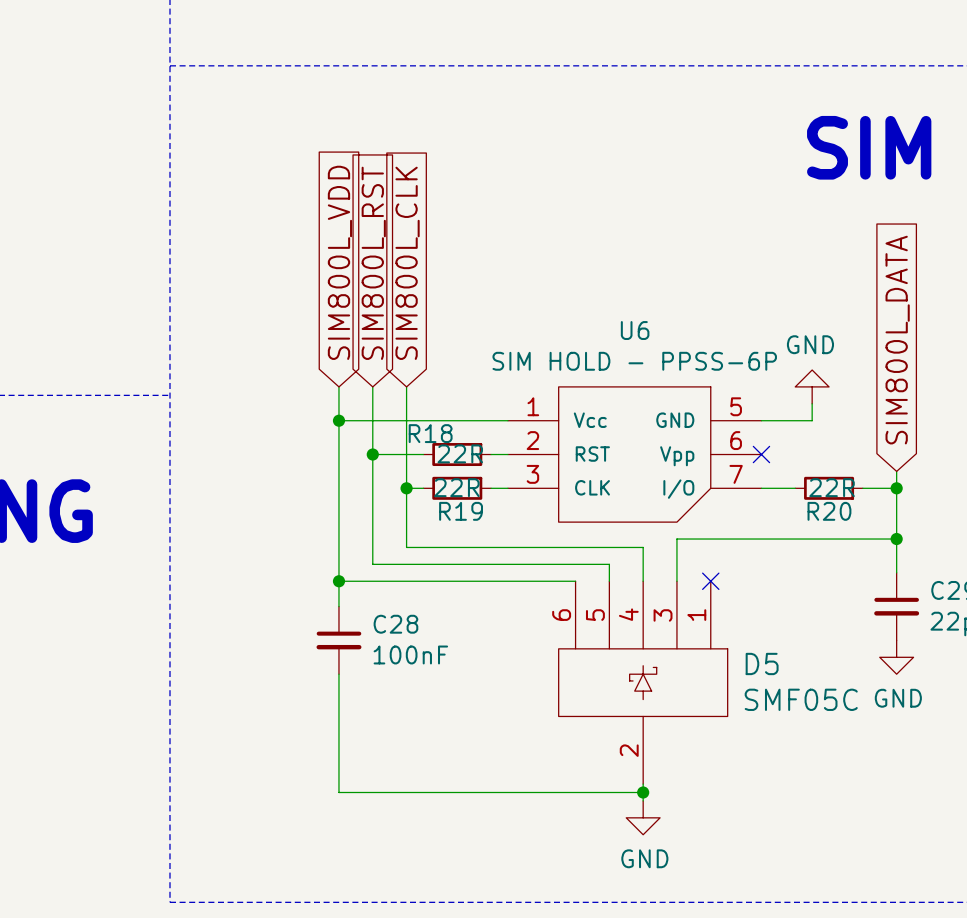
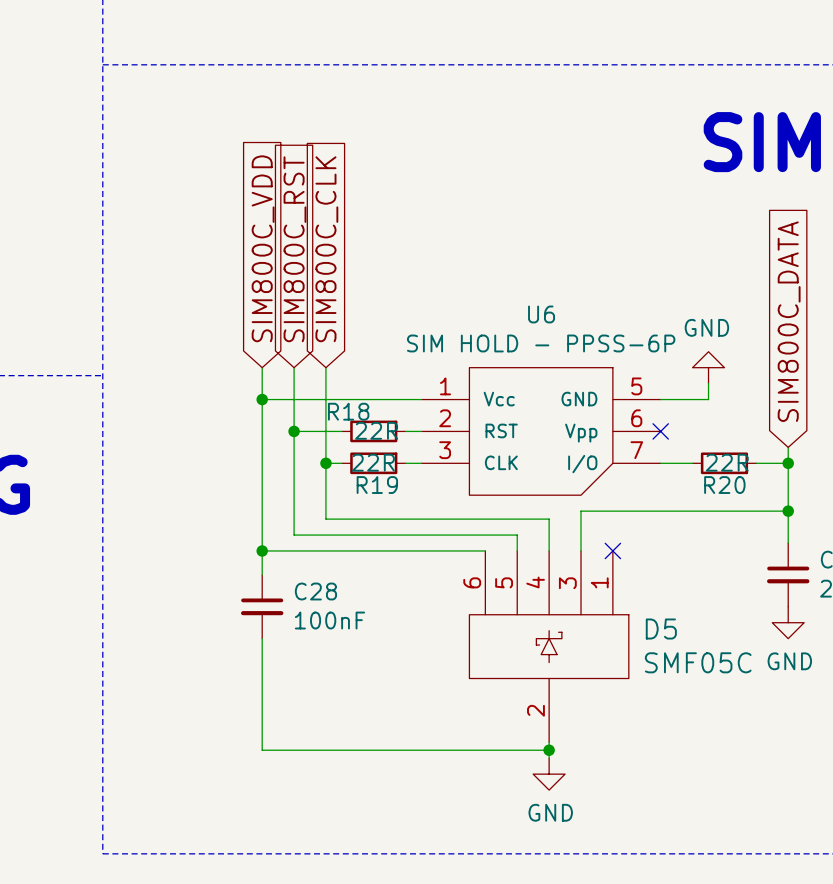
global label: SIM800L_VDD (339, 262) -> SIM800C_VDD (263, 248)
global label: SIM800L_RST (373, 263) -> SIM800C_RST (294, 249)
global label: SIM800L_CLK (407, 263) -> SIM800C_CLK (326, 249)
global label: SIM800L_DATA (897, 340) -> SIM800C_DATA (789, 321)

